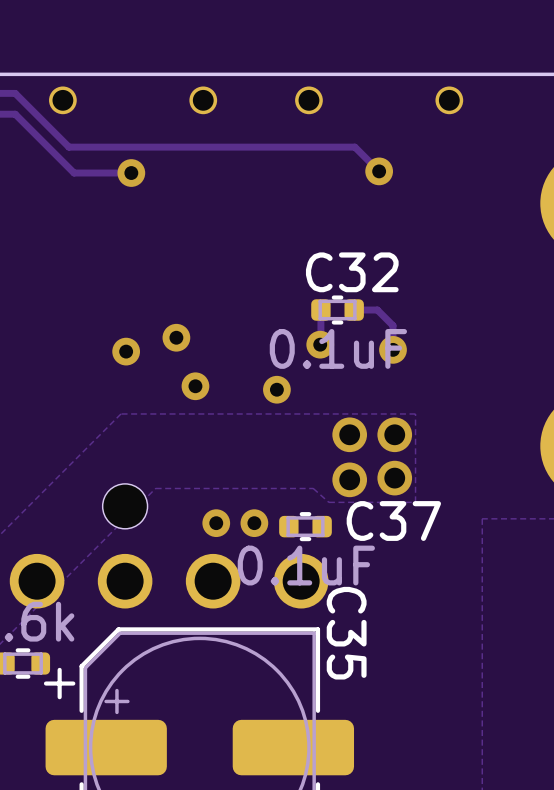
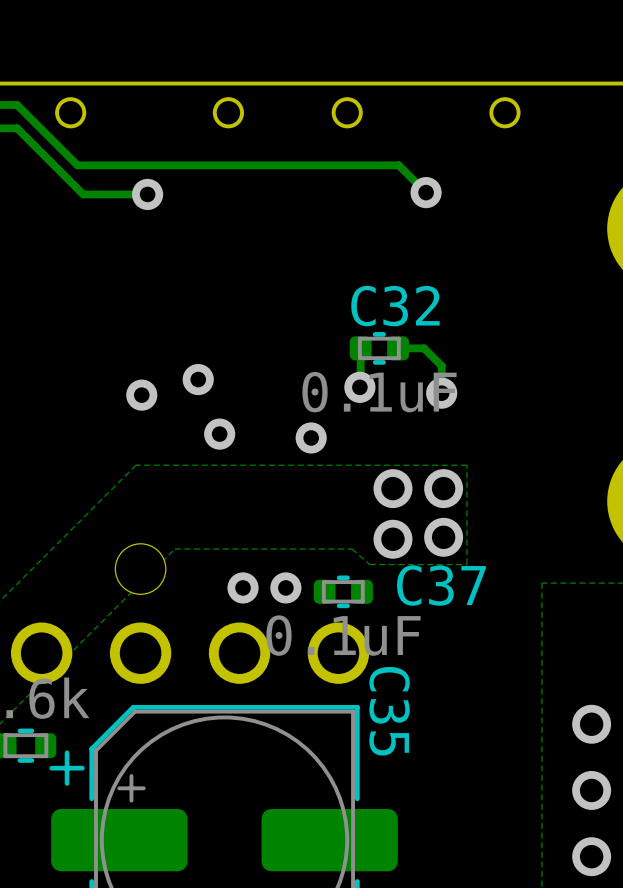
via: none -> (591, 724)
via: none -> (591, 790)
via: none -> (591, 856)

